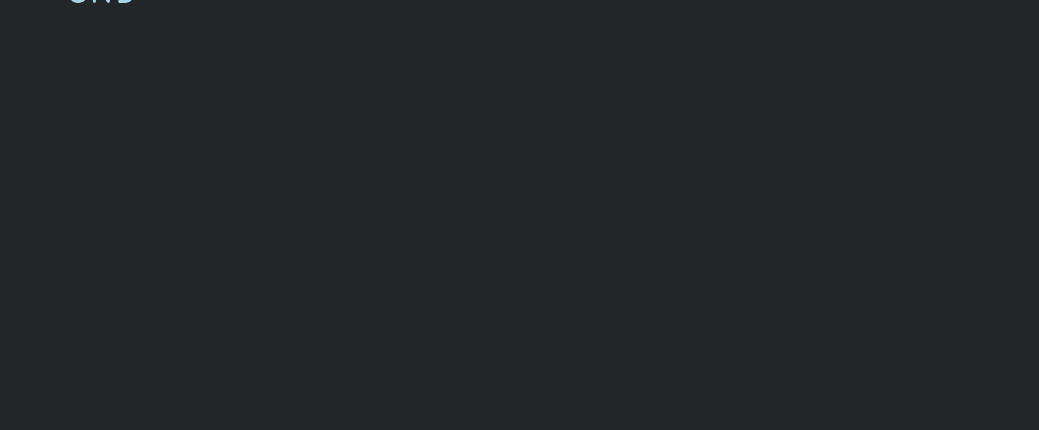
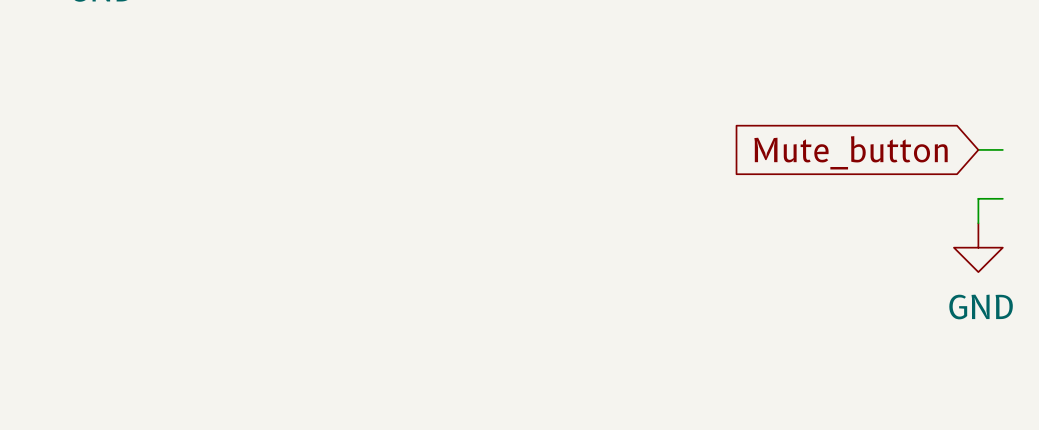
wire: none -> (978, 149) (1002, 149)
global label: none -> Mute_button (851, 152)
wire: none -> (1002, 198) (978, 198) (978, 223)
power symbol: none -> GND (978, 247)

